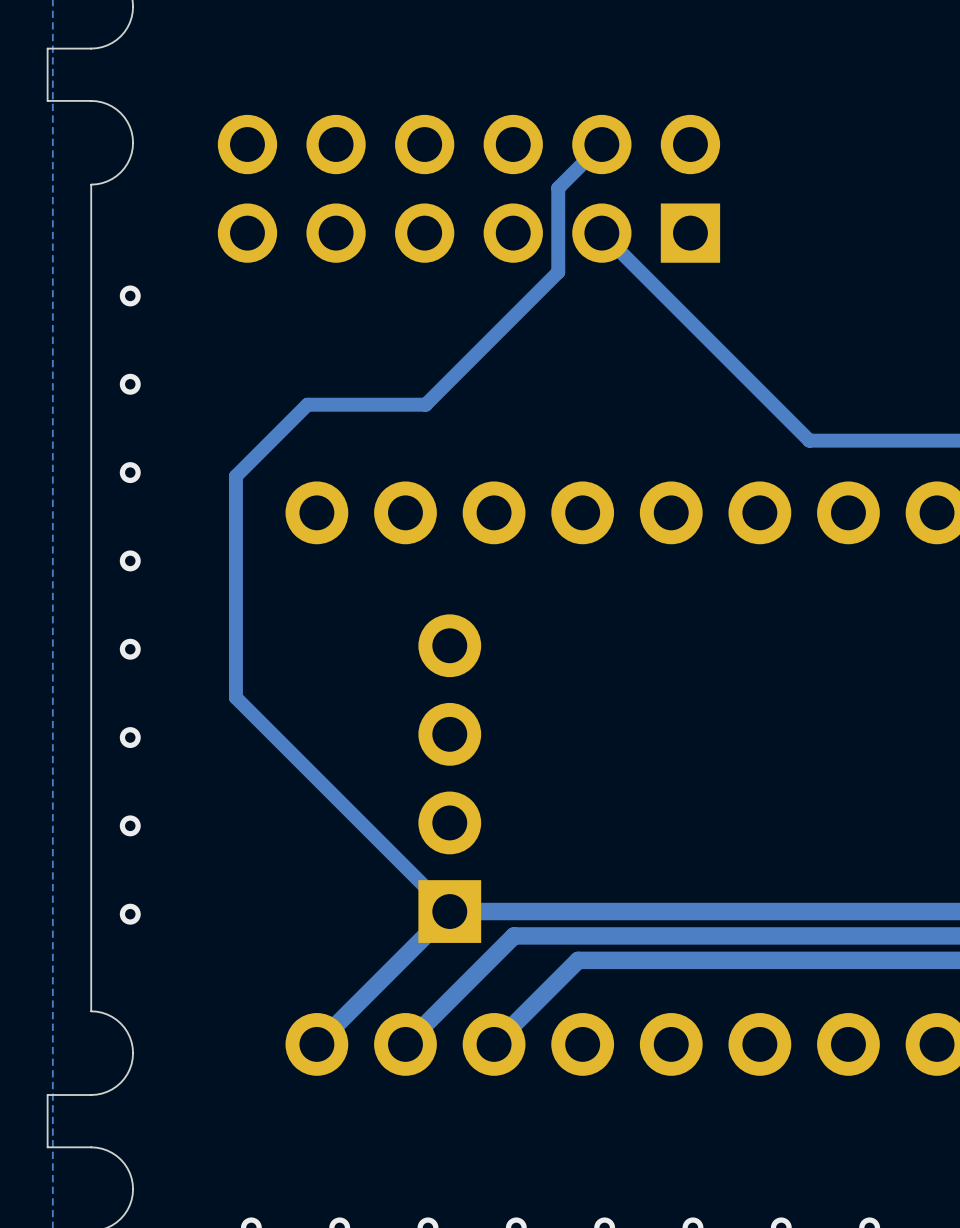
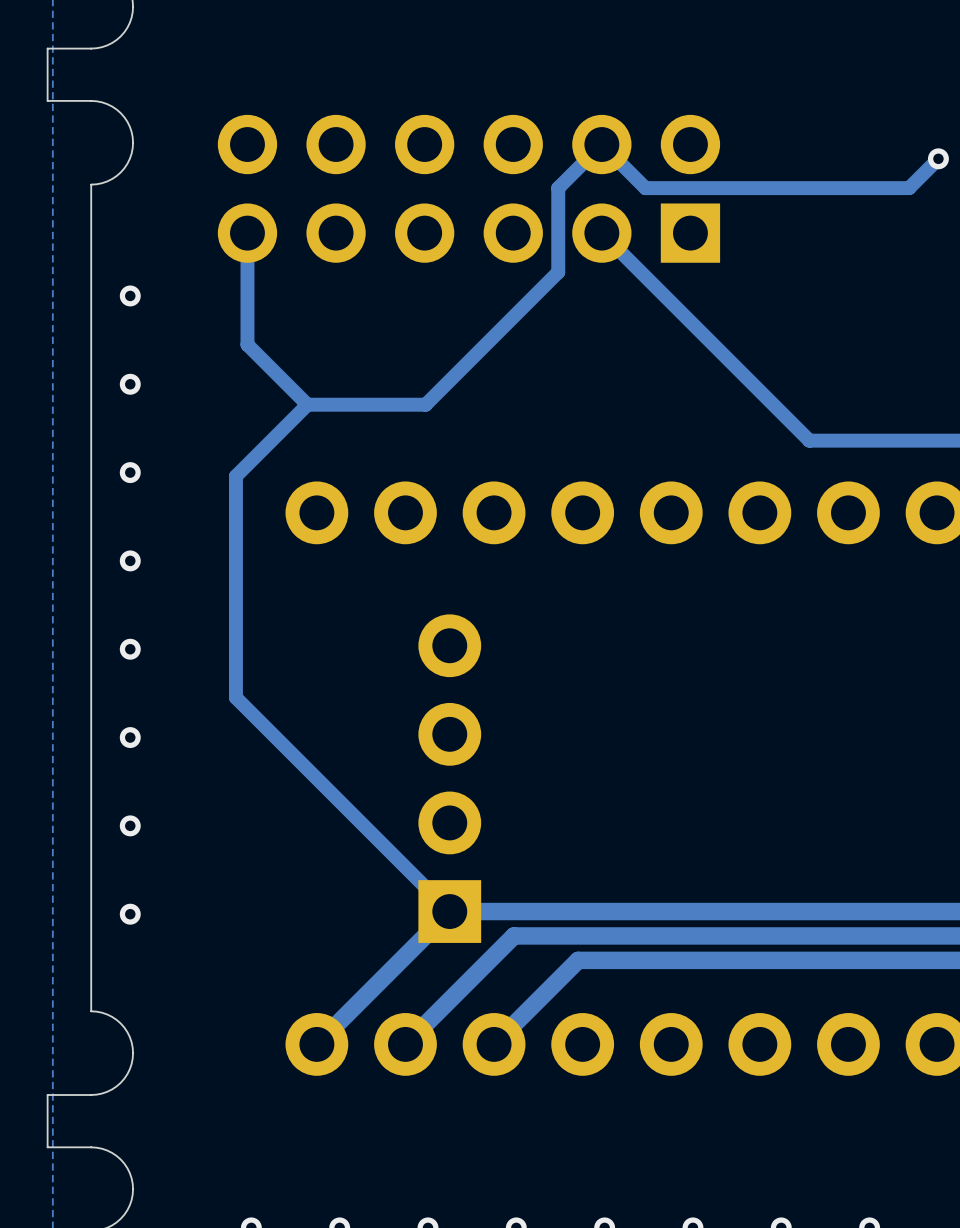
track: none -> (601, 144) (645, 188) (909, 188) (938, 158)
via: none -> (938, 158)
track: none -> (247, 233) (247, 344) (307, 404)

